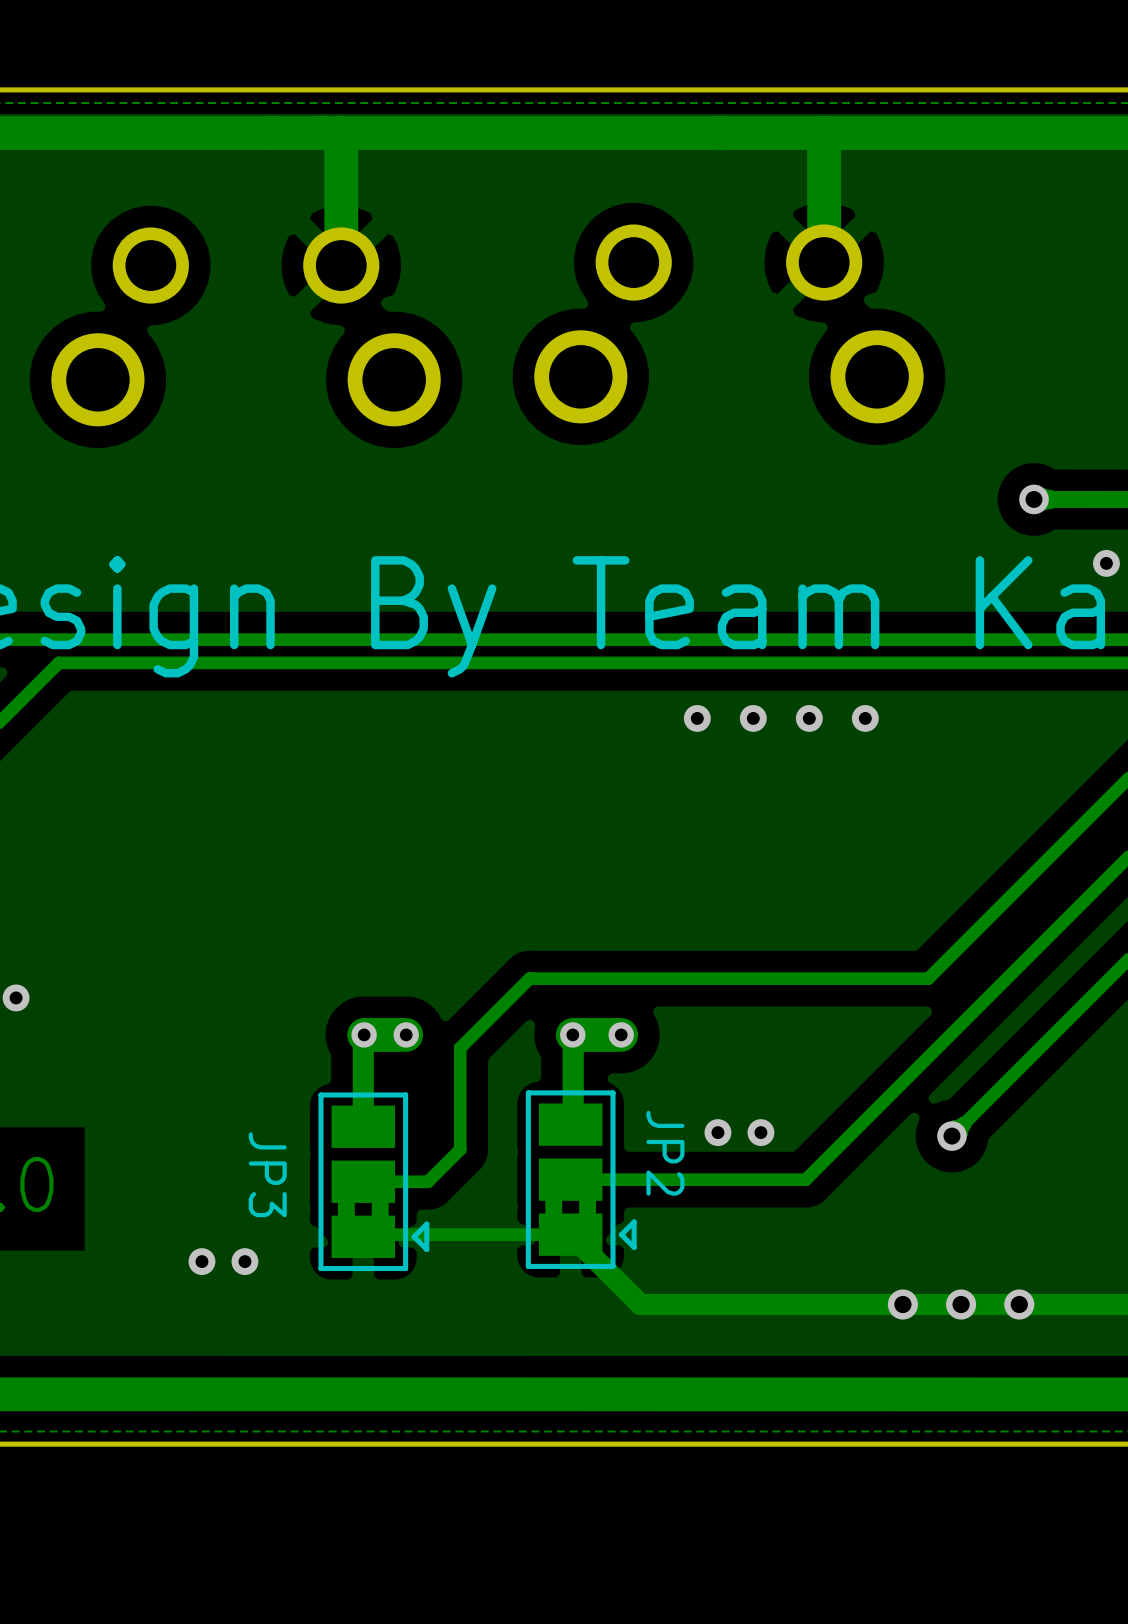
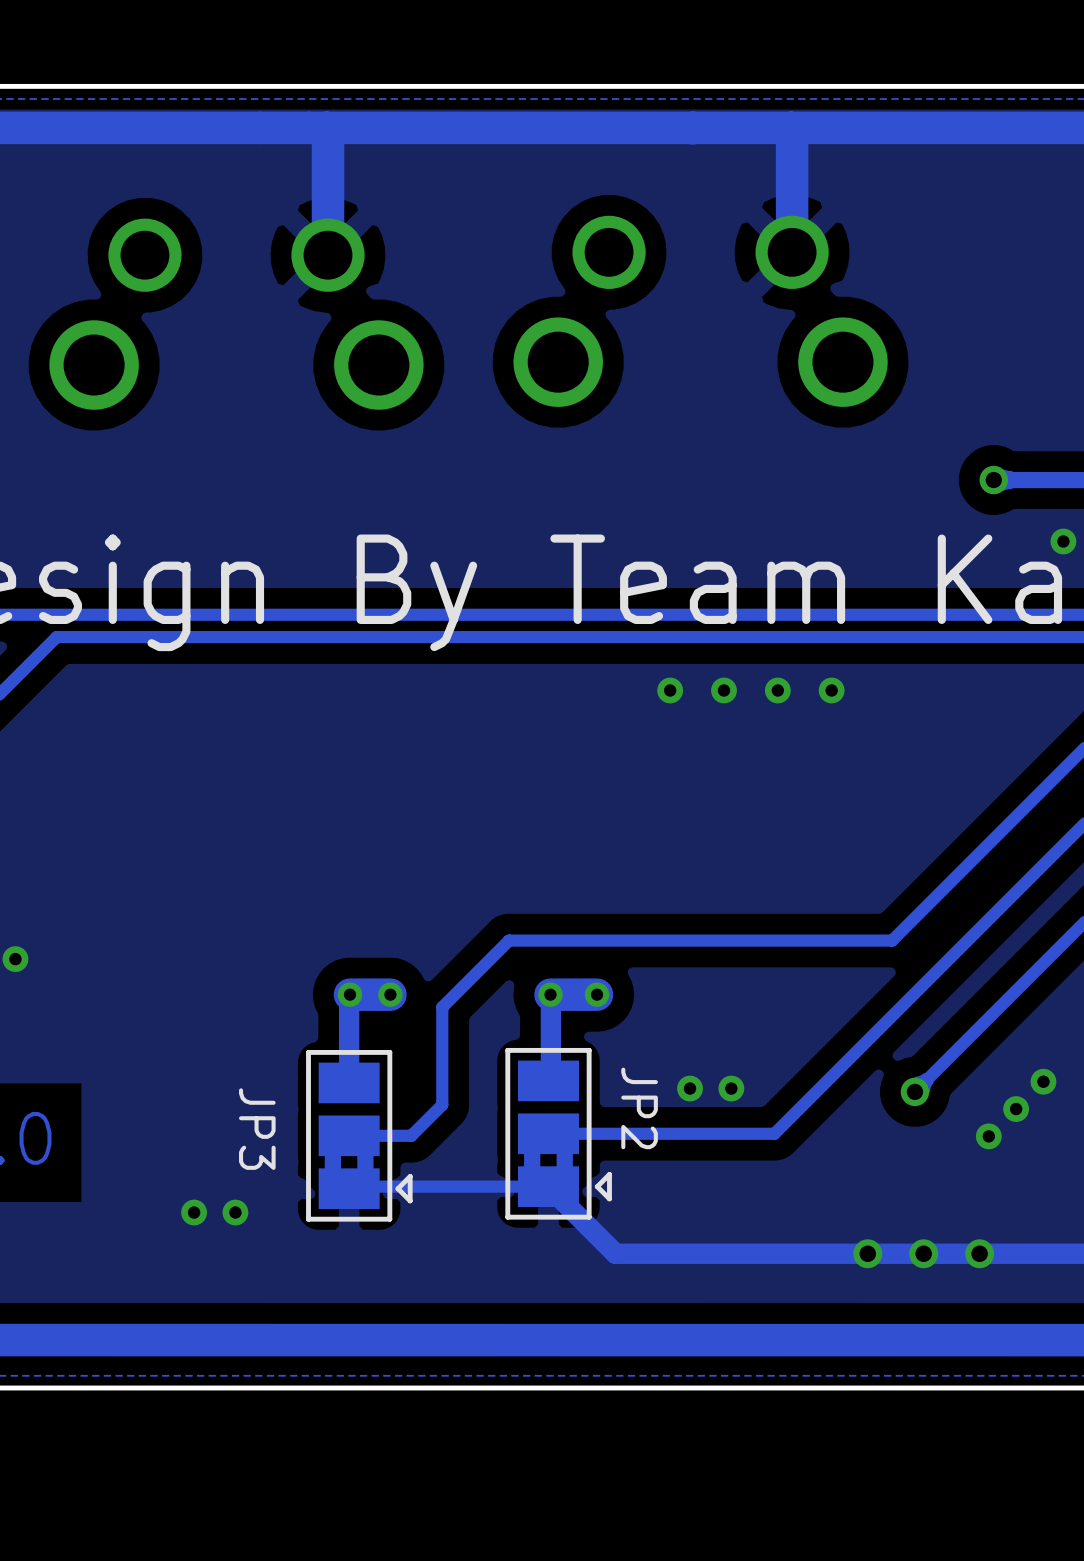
via: none -> (1043, 1081)
via: none -> (1016, 1109)
via: none -> (988, 1136)

